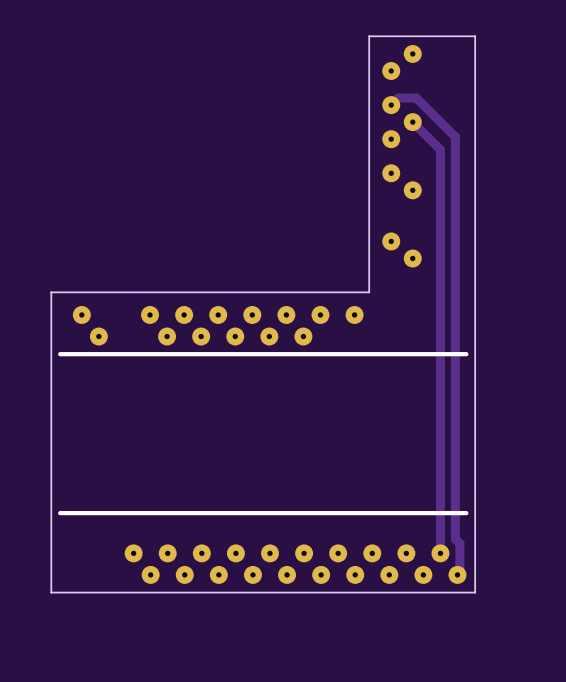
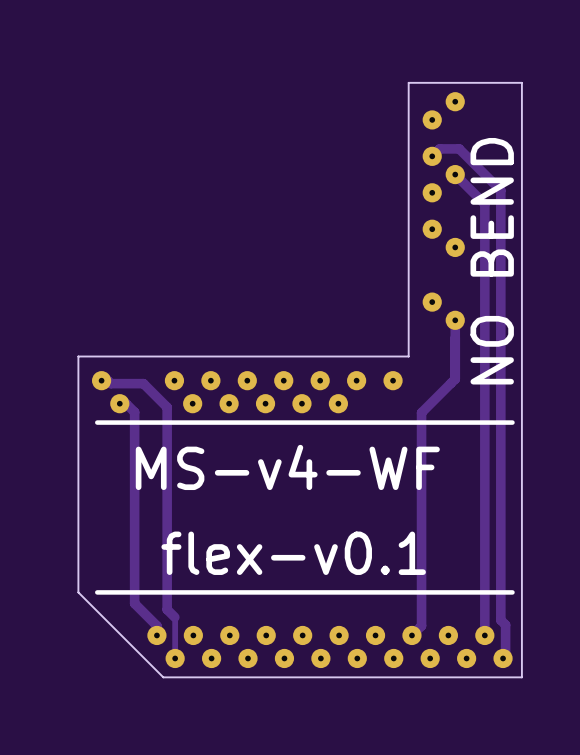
text: none -> NO BEND (492, 261)
track: none -> (455, 320) (455, 379) (421, 412) (421, 625) (411, 635)
board edge: (60, 292) (51, 292) (51, 592) (139, 592) -> (78, 356) (78, 592) (163, 677)
track: none -> (101, 380) (107, 380) (110, 383) (143, 383) (167, 407) (167, 609) (174, 617)
track: none -> (119, 403) (126, 403) (134, 412) (134, 603) (156, 625) (156, 635)
line: (60, 354) (77, 354) -> none
text: none -> MS-v4-WF (287, 467)
text: none -> flex-v0.1 (293, 553)
line: (60, 513) (77, 513) -> none
track: none -> (175, 617) (175, 658)

